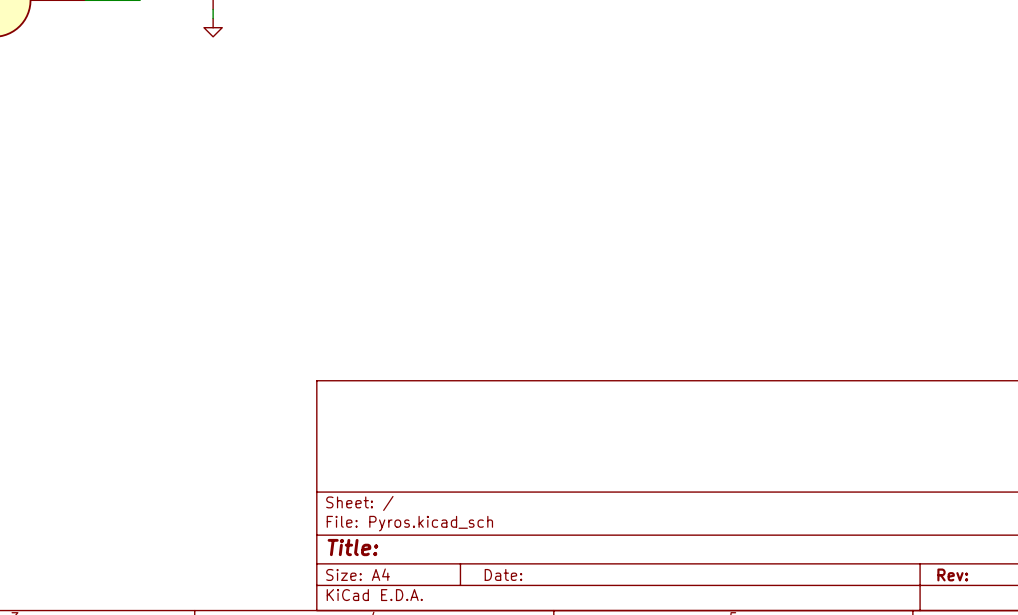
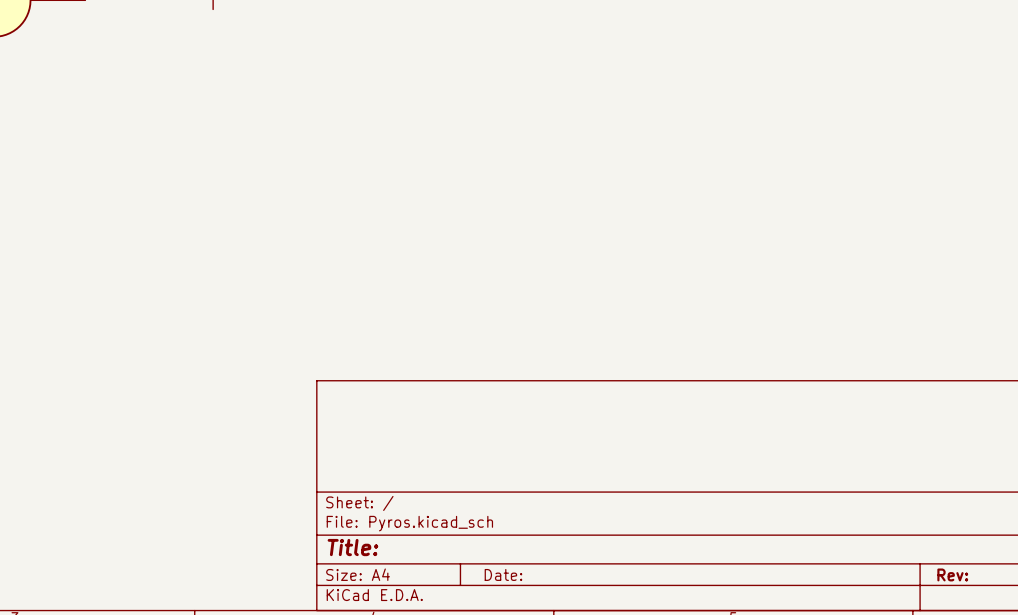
wire: (85, 0) (140, 0) -> none
wire: (213, 9) (213, 18) -> none
power symbol: (213, 27) -> none

